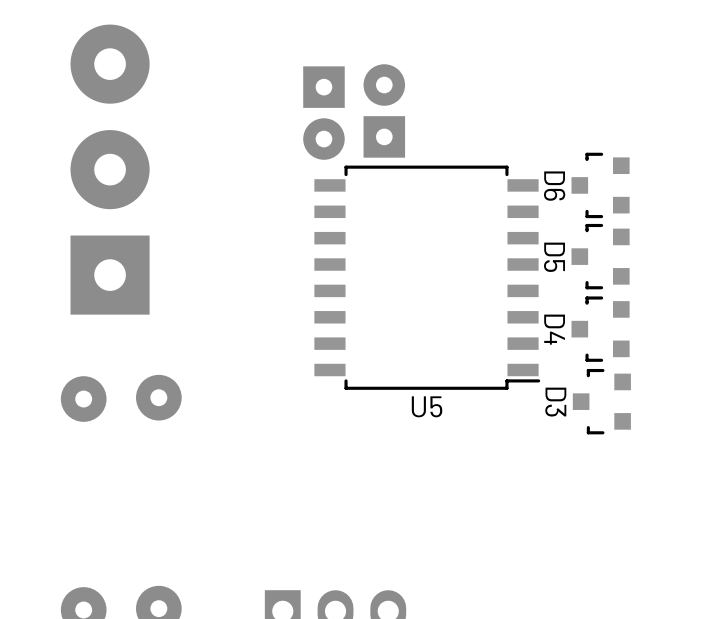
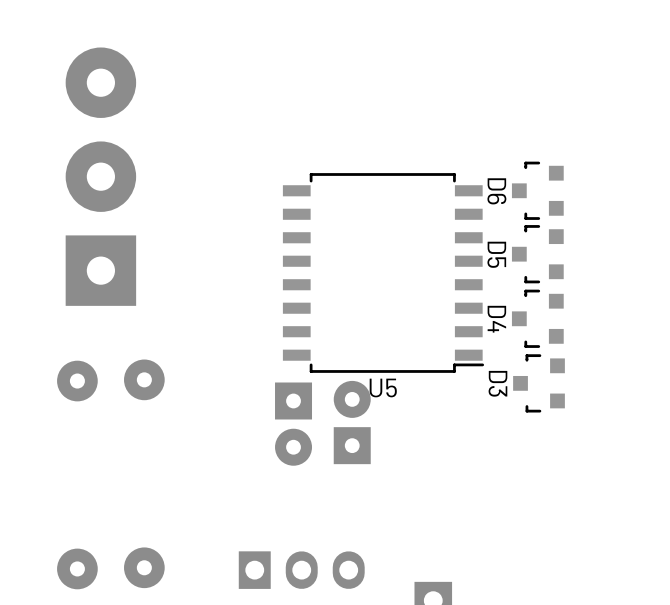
part: (384, 110) -> none
part: (323, 113) -> none
part: none -> (352, 422)
part: none -> (293, 424)

